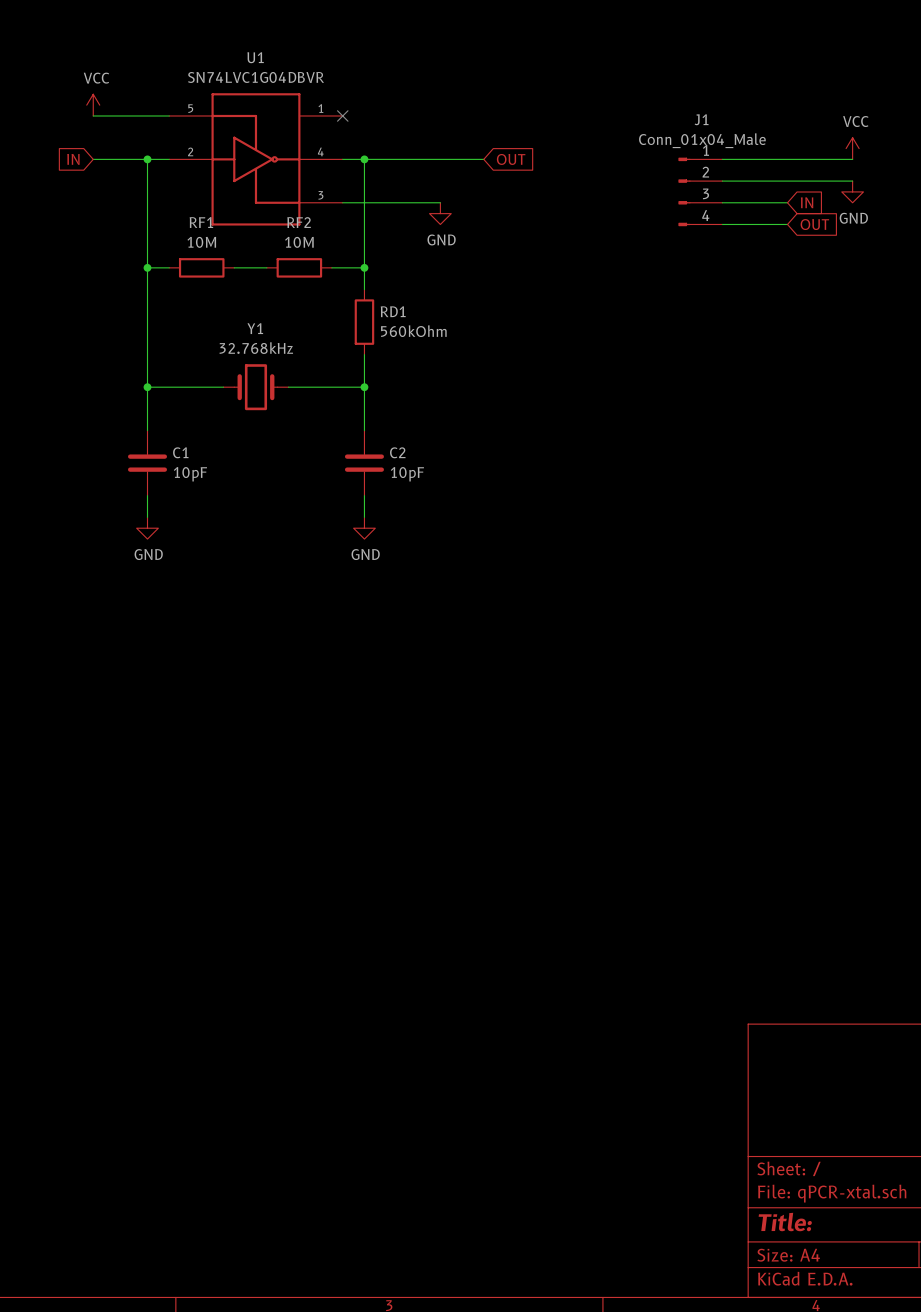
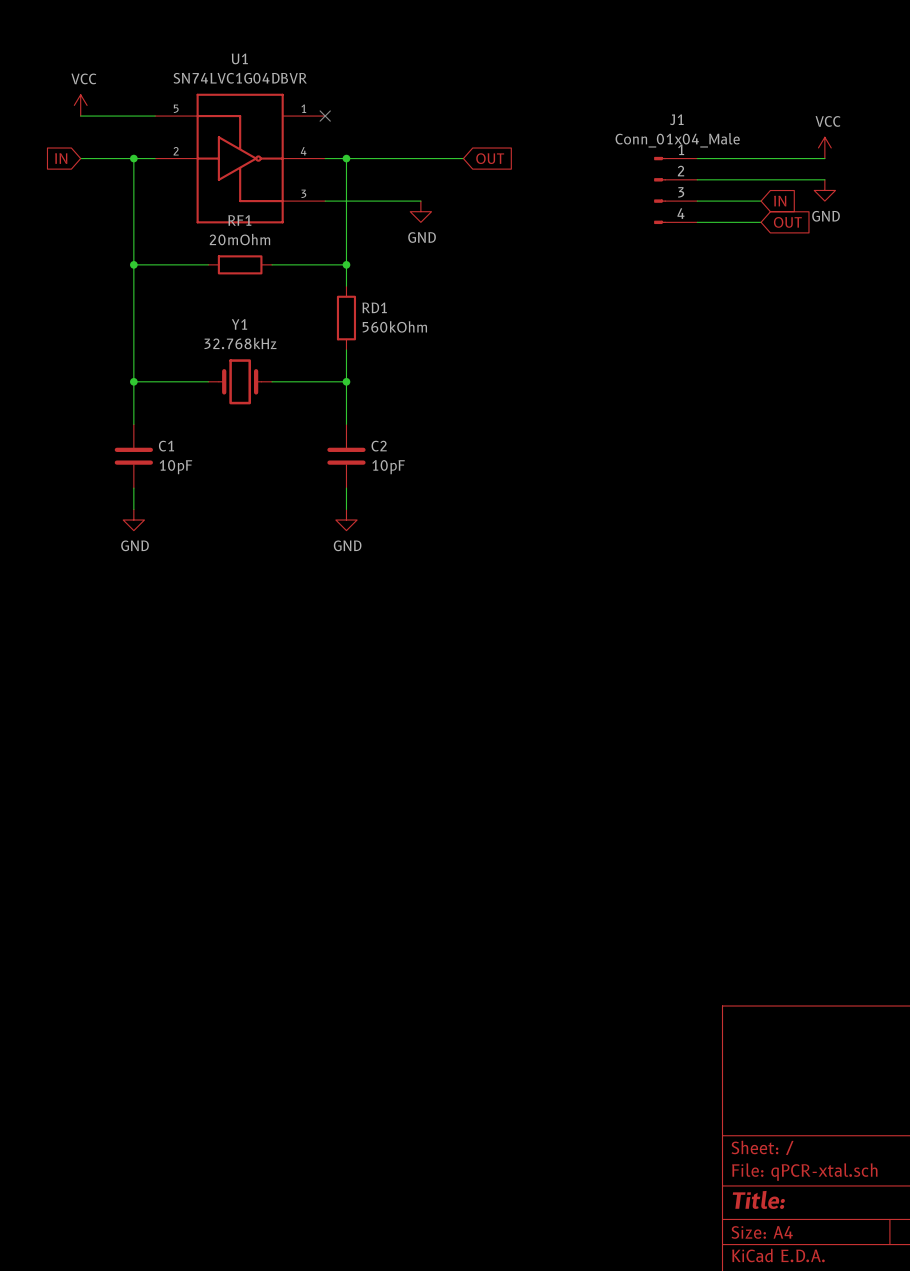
RF1 value: 10M (201, 242) -> 20mOhm (239, 239)
wire: none -> (155, 264) (208, 264)
RF1 position: (201, 267) -> (240, 264)
wire: (234, 267) (266, 267) -> none
wire: none -> (272, 264) (314, 264)
RF2: 10M (299, 267) -> none

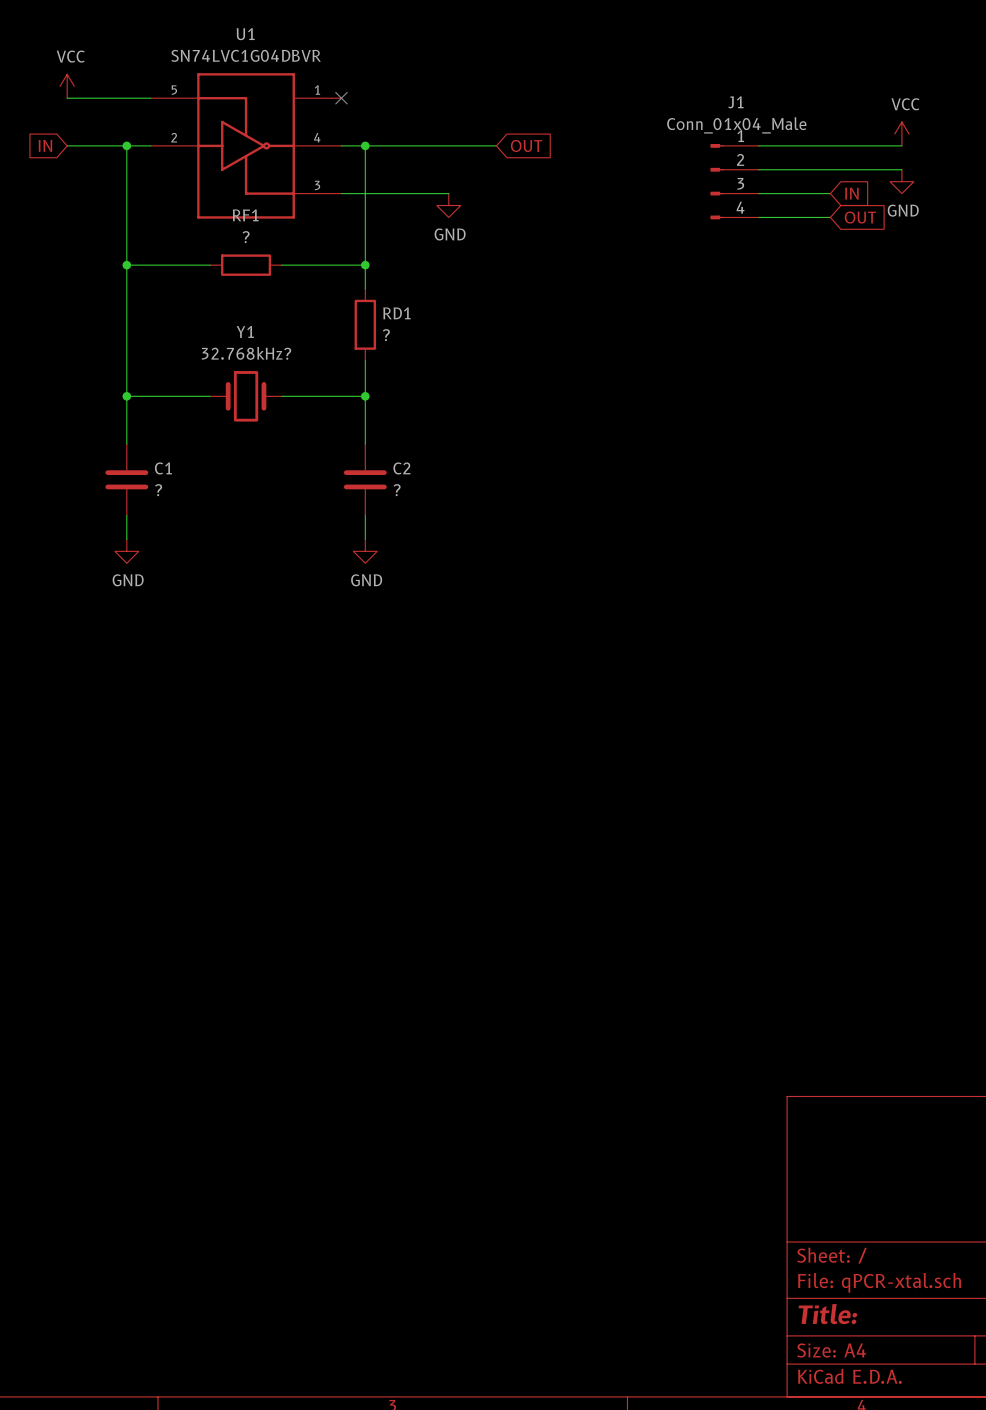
RF1 value: 20mOhm (239, 239) -> ? (246, 237)
RD1 value: 560kOhm (394, 326) -> ? (386, 335)
Y1 value: 32.768kHz (240, 343) -> 32.768kHz? (246, 353)
C1 value: 10pF (175, 467) -> ? (158, 490)
C2 value: 10pF (388, 467) -> ? (397, 490)

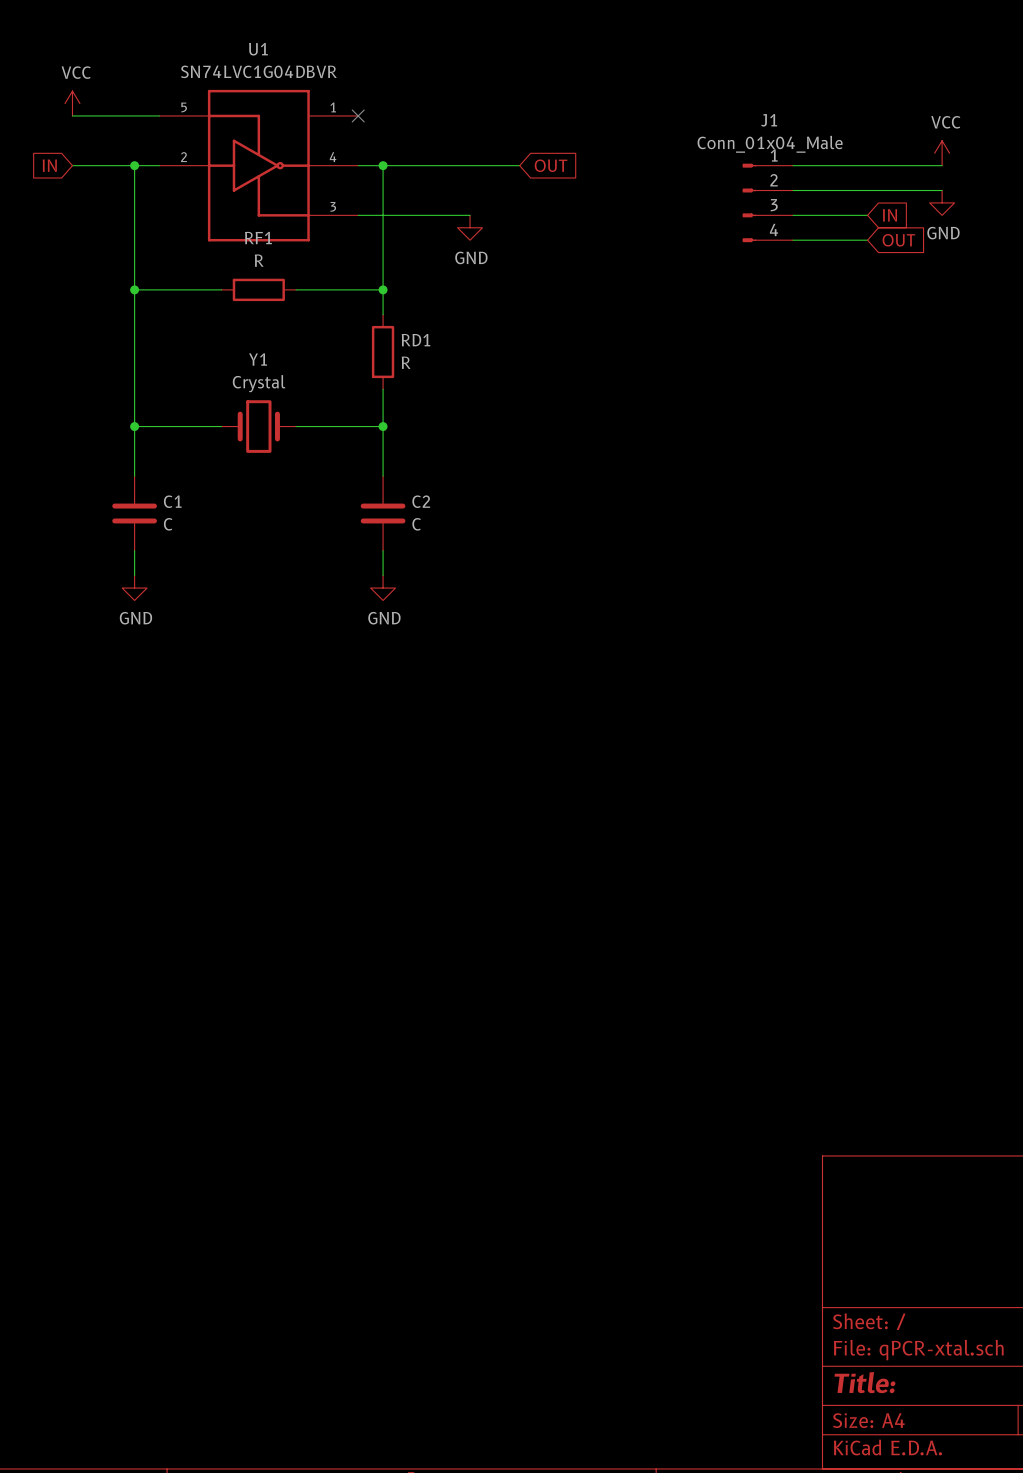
RF1 value: ? (246, 237) -> R (259, 260)
RD1 value: ? (386, 335) -> R (406, 362)
Y1 value: 32.768kHz? (246, 353) -> Crystal (259, 383)
C1 value: ? (158, 490) -> C (168, 524)
C2 value: ? (397, 490) -> C (416, 524)

